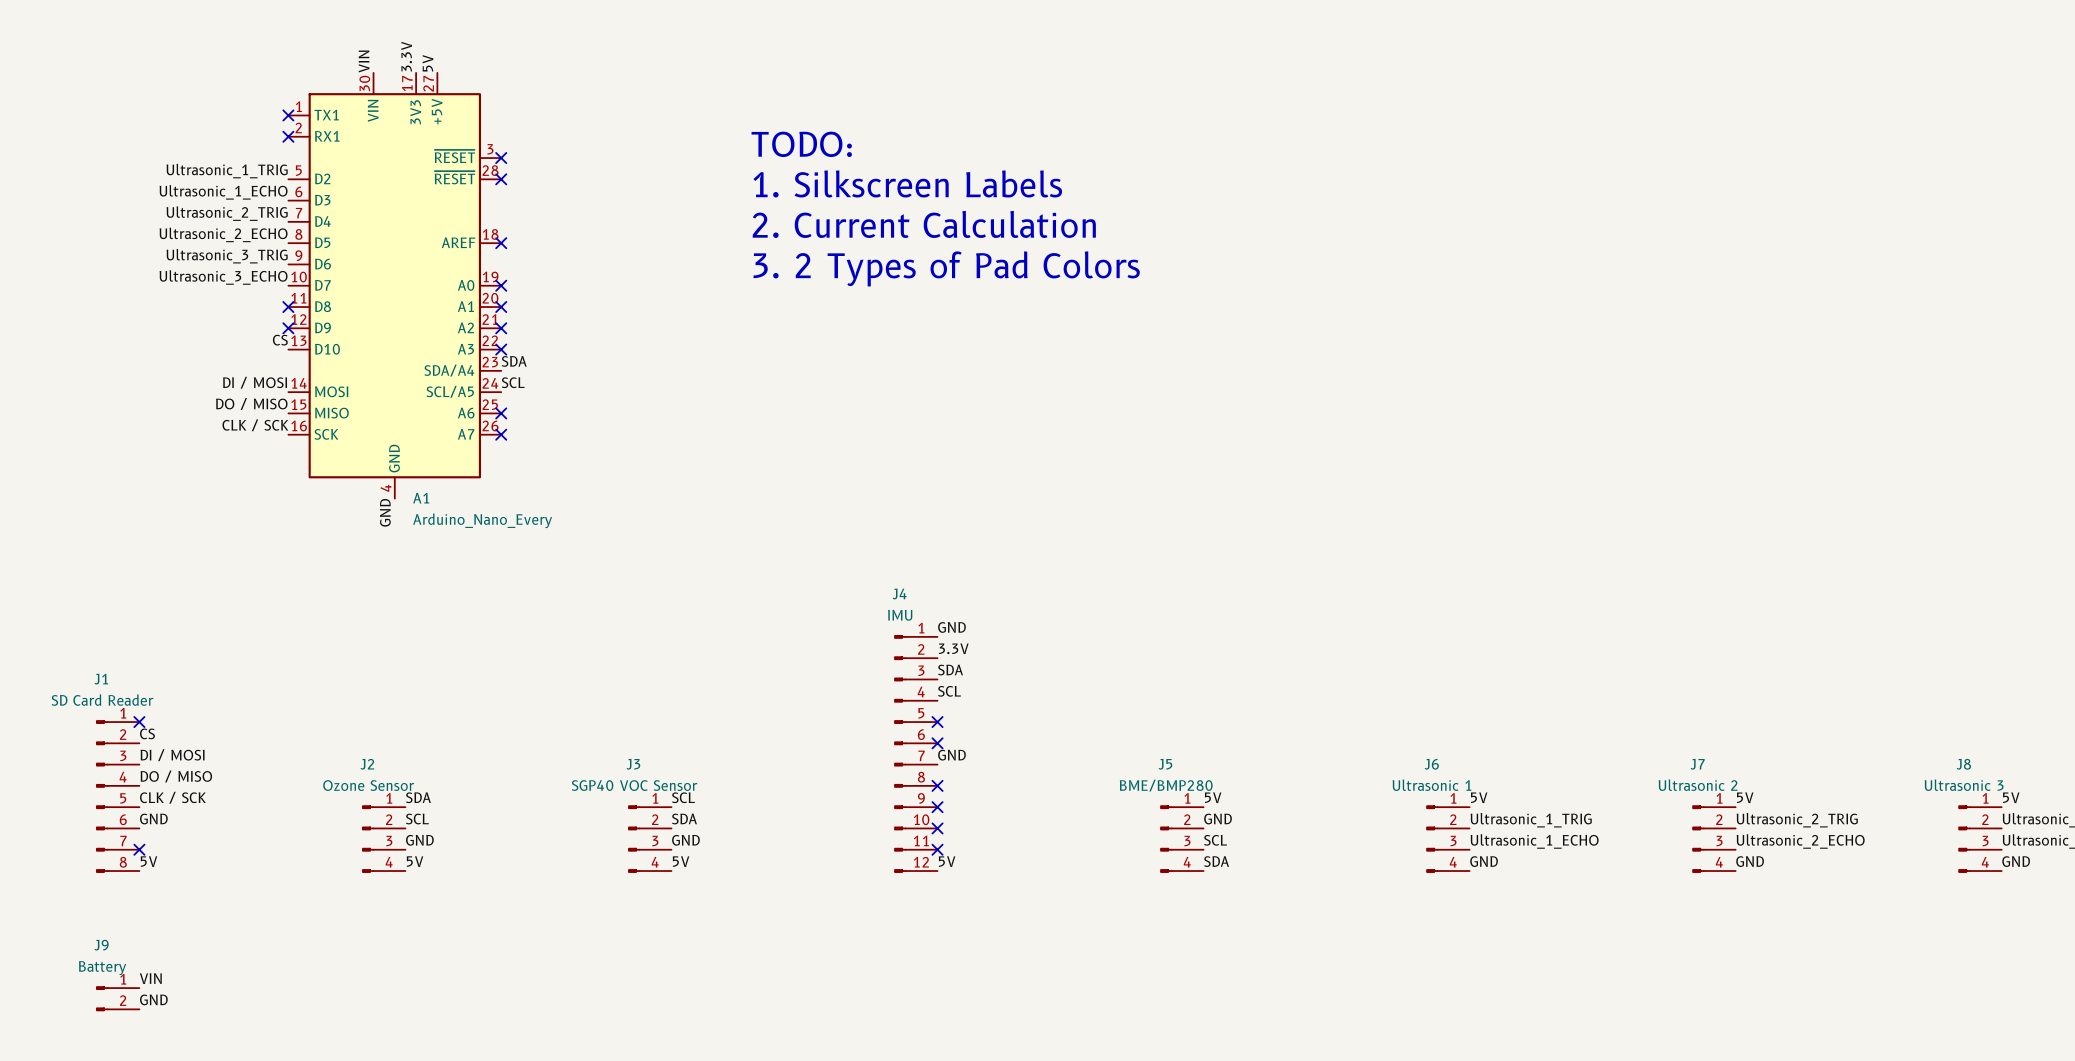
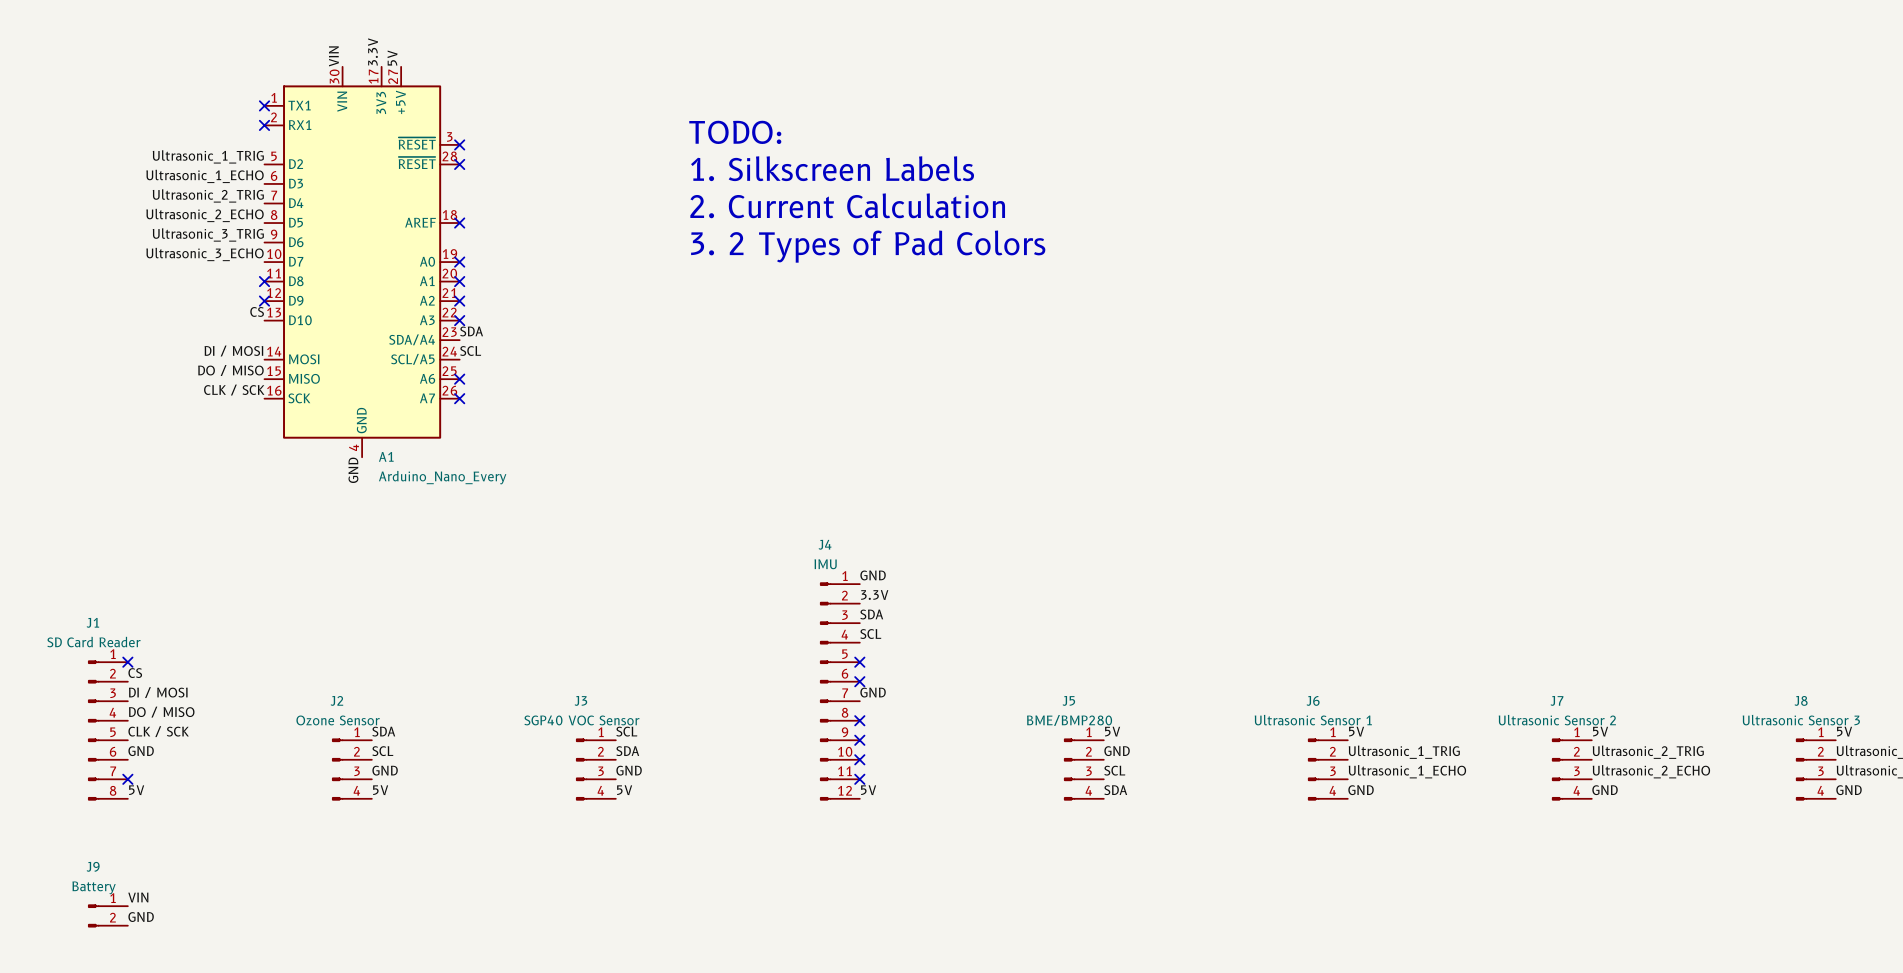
J6 value: Ultrasonic 1 (1432, 785) -> Ultrasonic Sensor 1 (1313, 720)
J7 value: Ultrasonic 2 (1698, 785) -> Ultrasonic Sensor 2 (1557, 720)
J8 value: Ultrasonic 3 (1964, 785) -> Ultrasonic Sensor 3 (1801, 720)

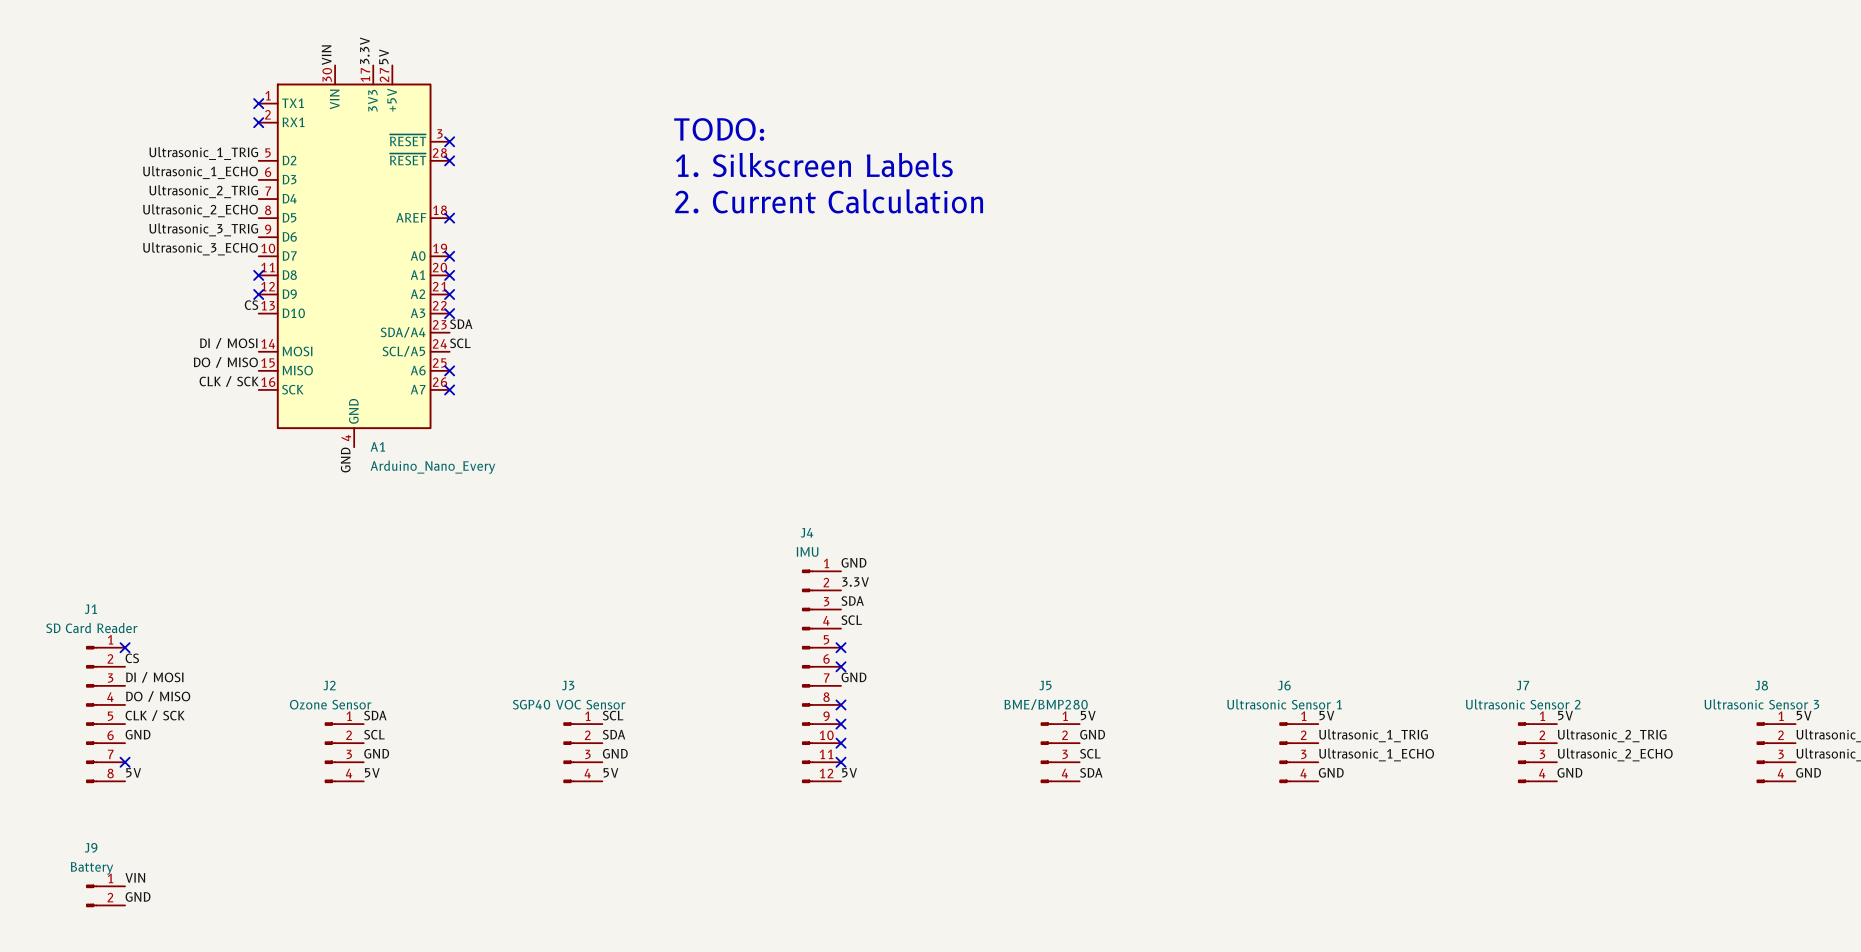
text: 3. 2 Types of Pad Colors (868, 246) -> none

